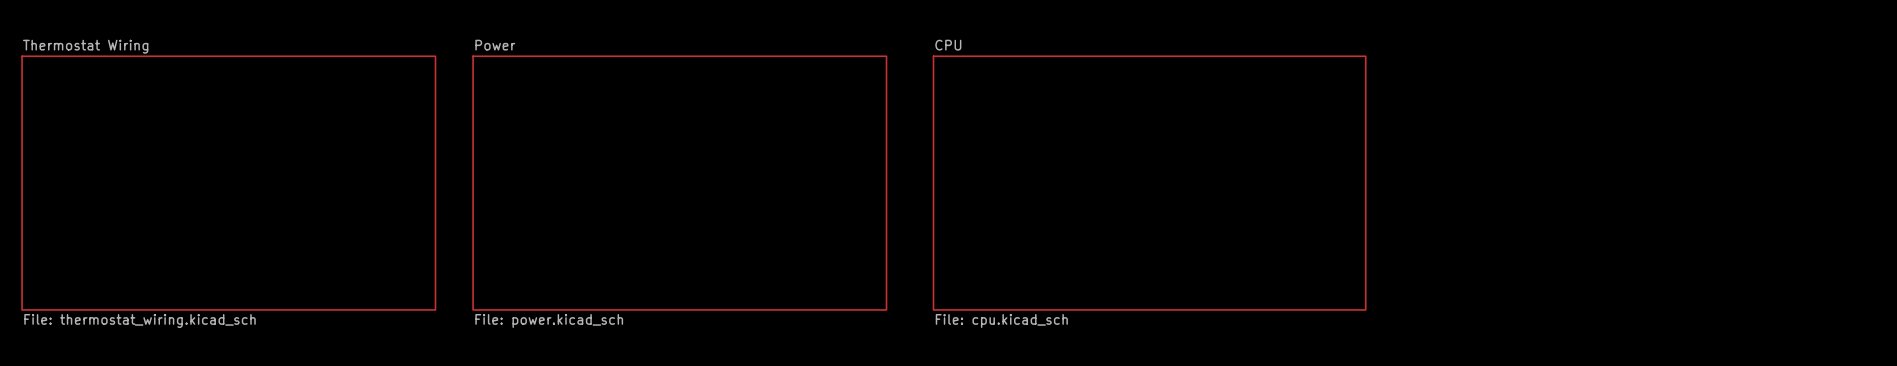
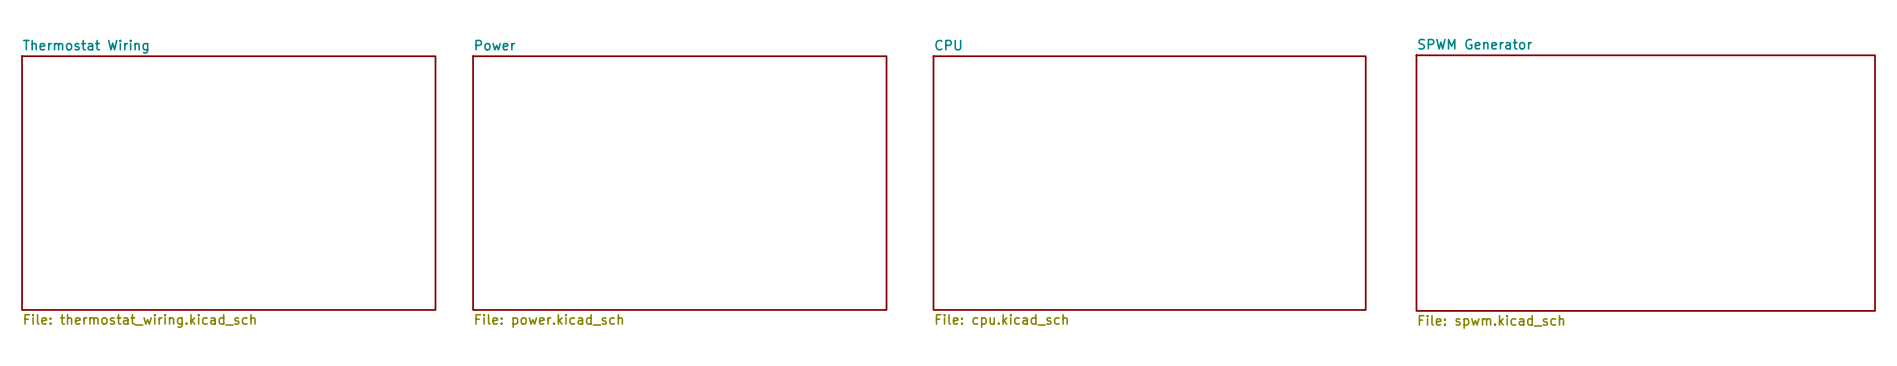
sheet SPWM Generator: none -> File: spwm.kicad_sch (1645, 183)

